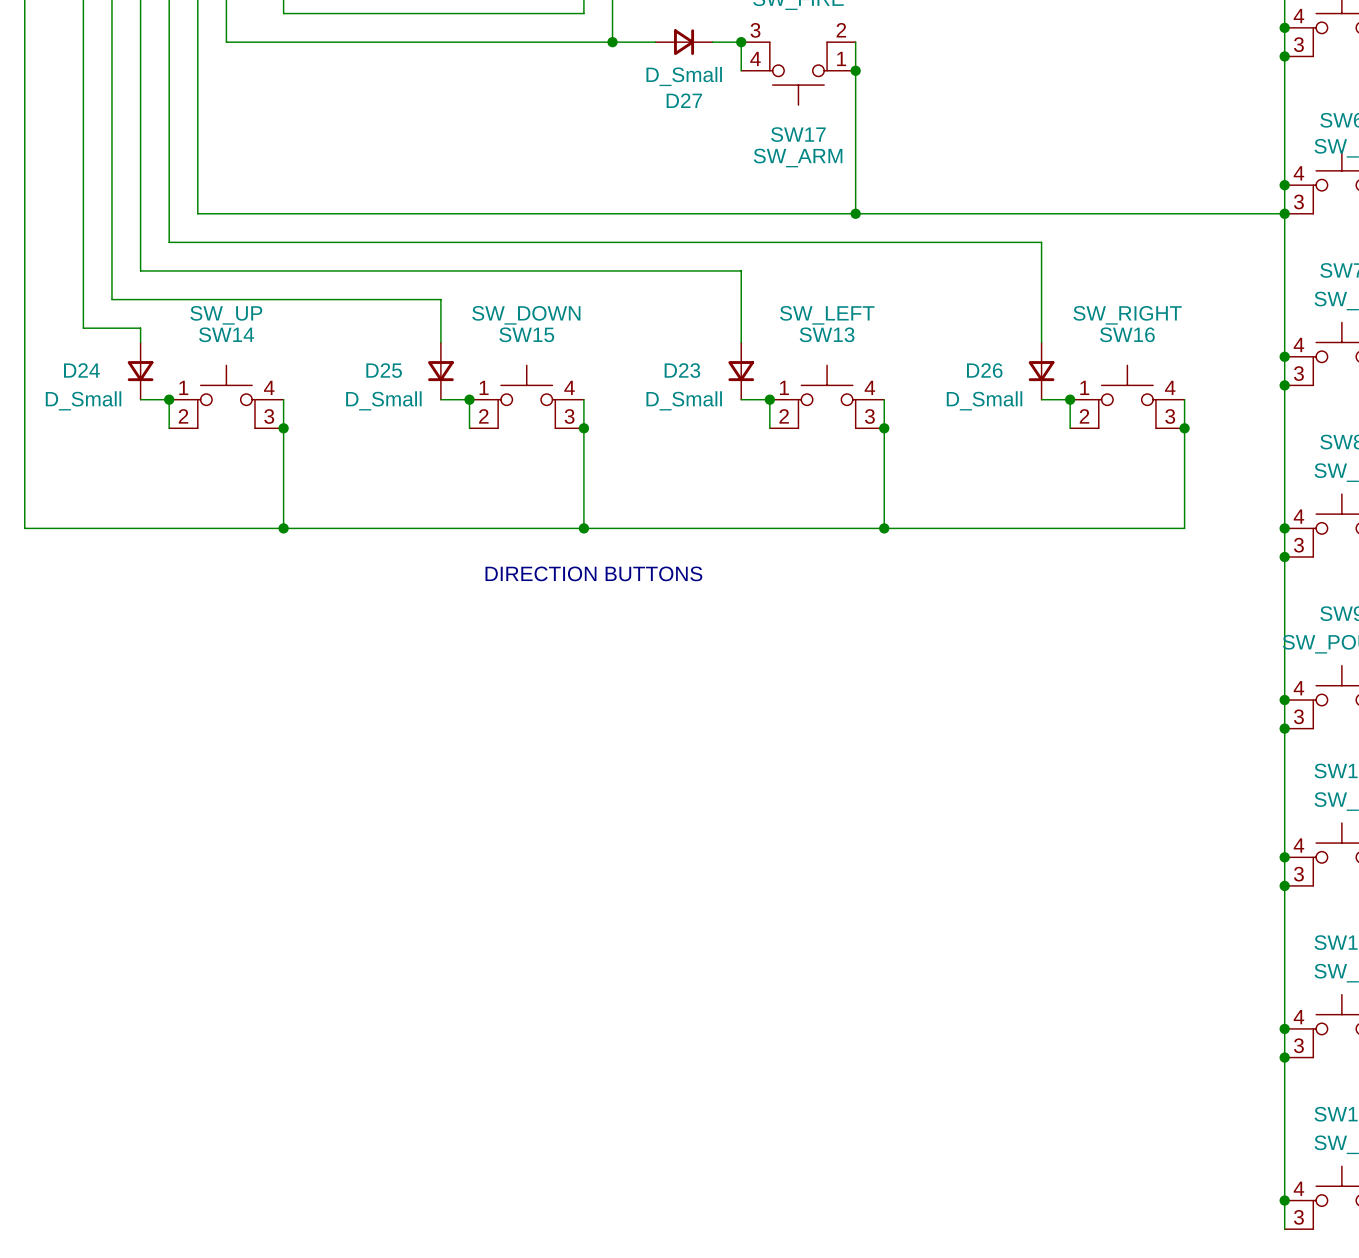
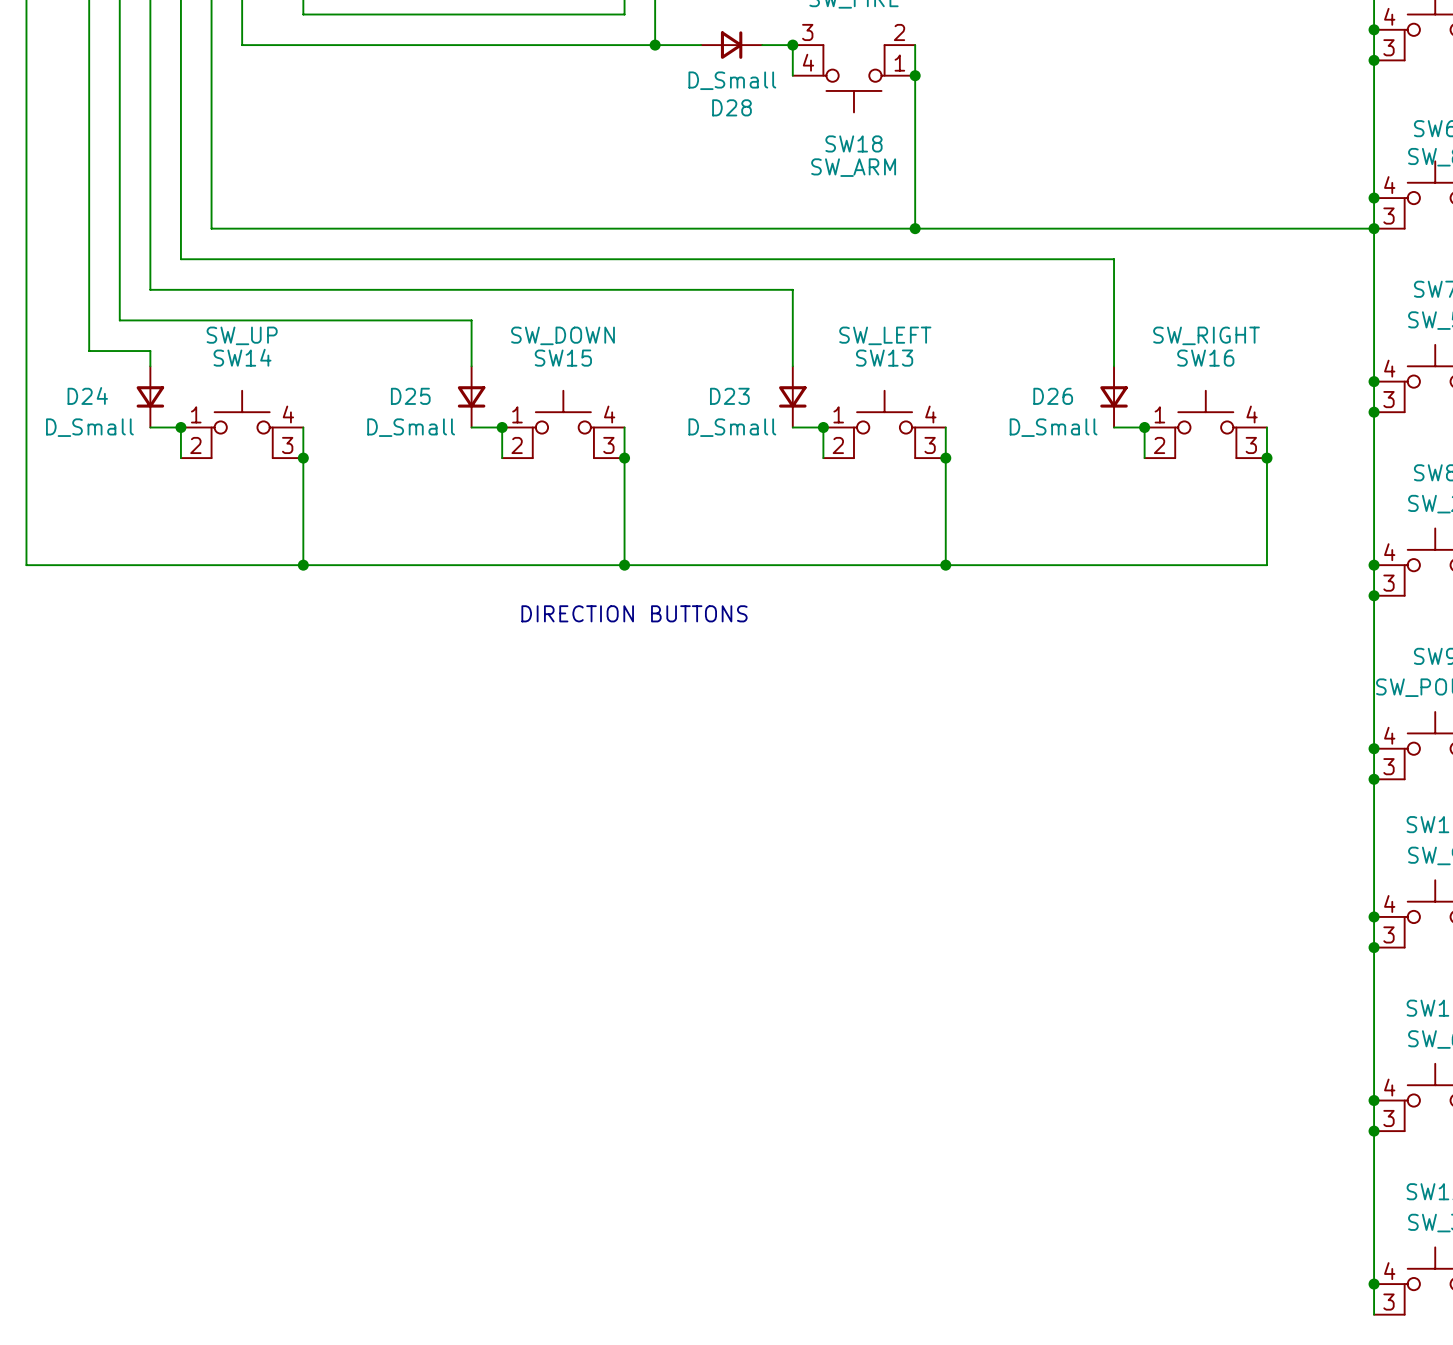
D27 name: D27 (684, 100) -> D28 (731, 107)
SW17 name: SW17 (798, 134) -> SW18 (853, 143)

